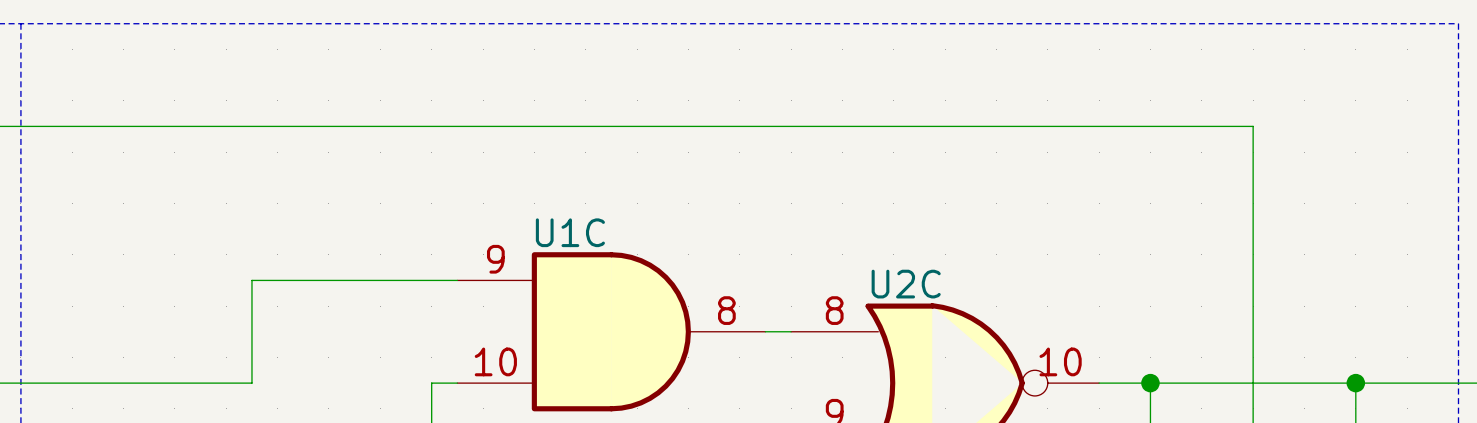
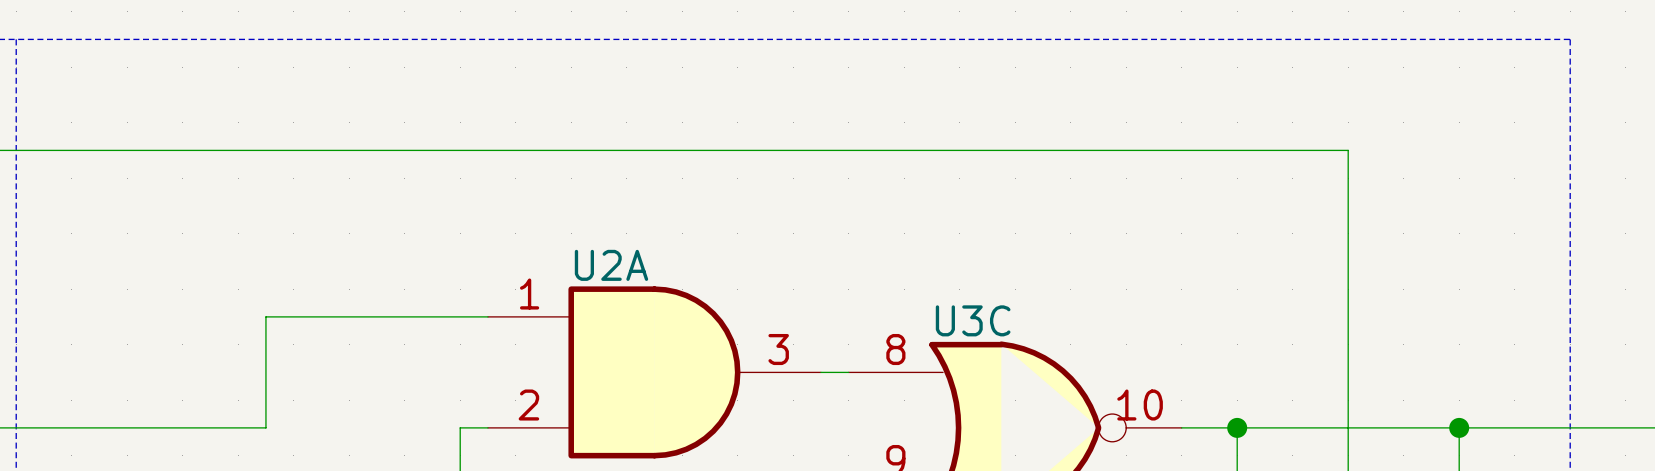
U1C name: U1C (570, 232) -> U2A (611, 265)
U1C pin number: 9 (495, 259) -> 1 (529, 294)
U2C name: U2C (906, 284) -> U3C (973, 320)
U1C pin number: 8 (726, 310) -> 3 (778, 349)
U1C pin number: 10 (495, 361) -> 2 (528, 405)

